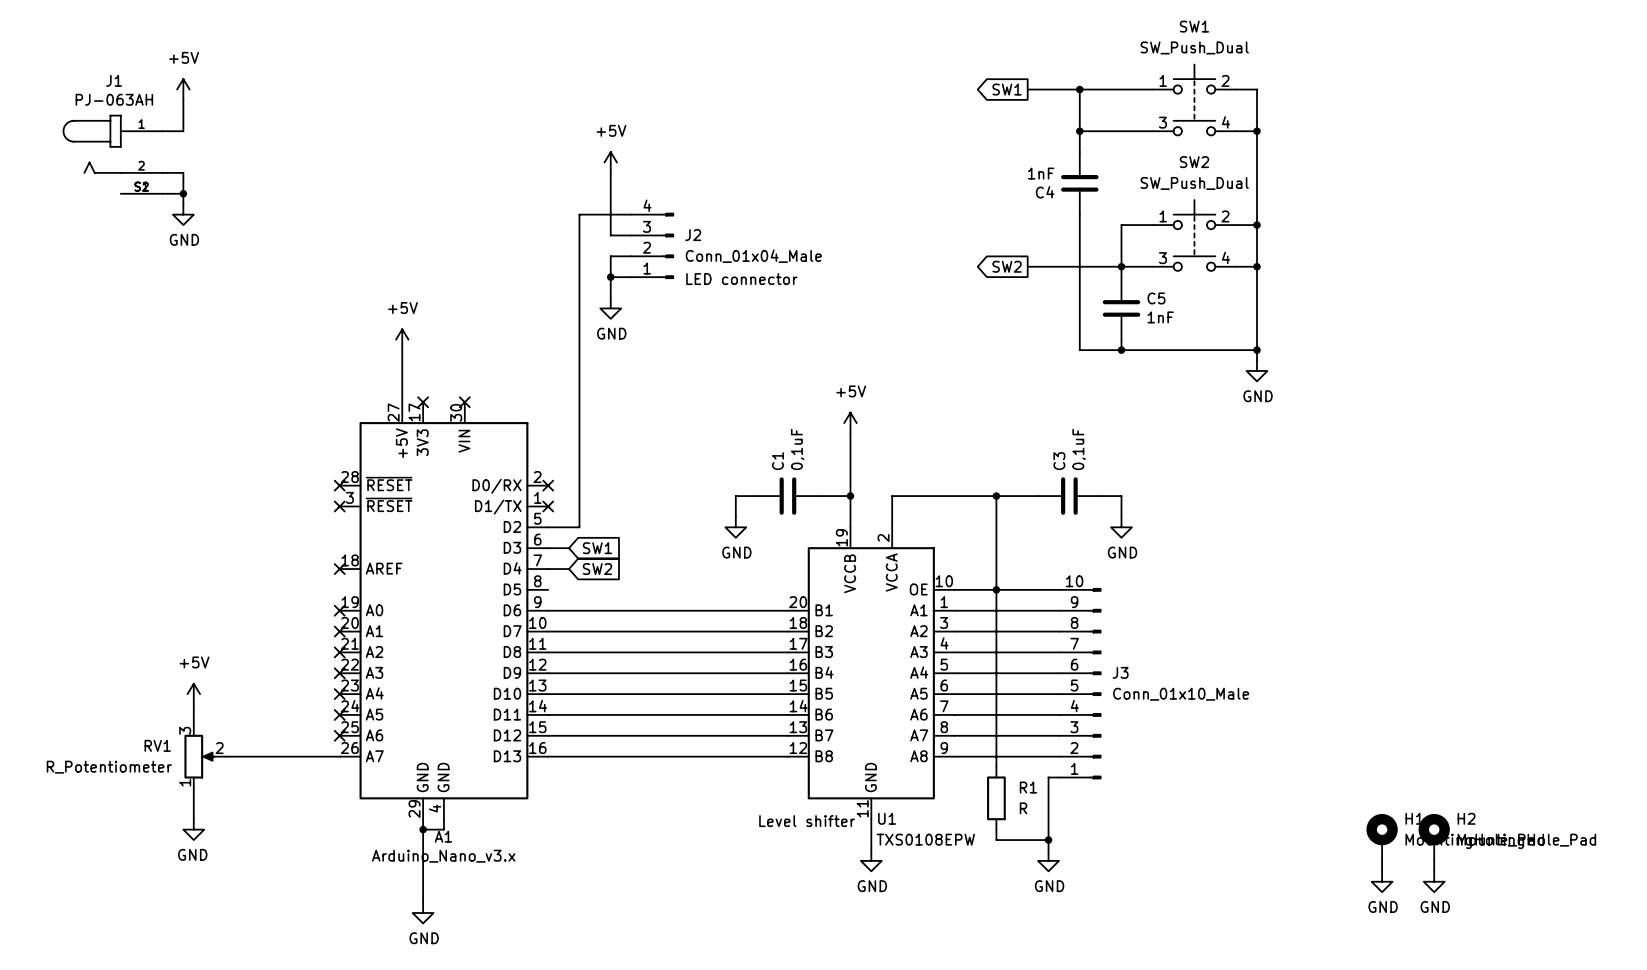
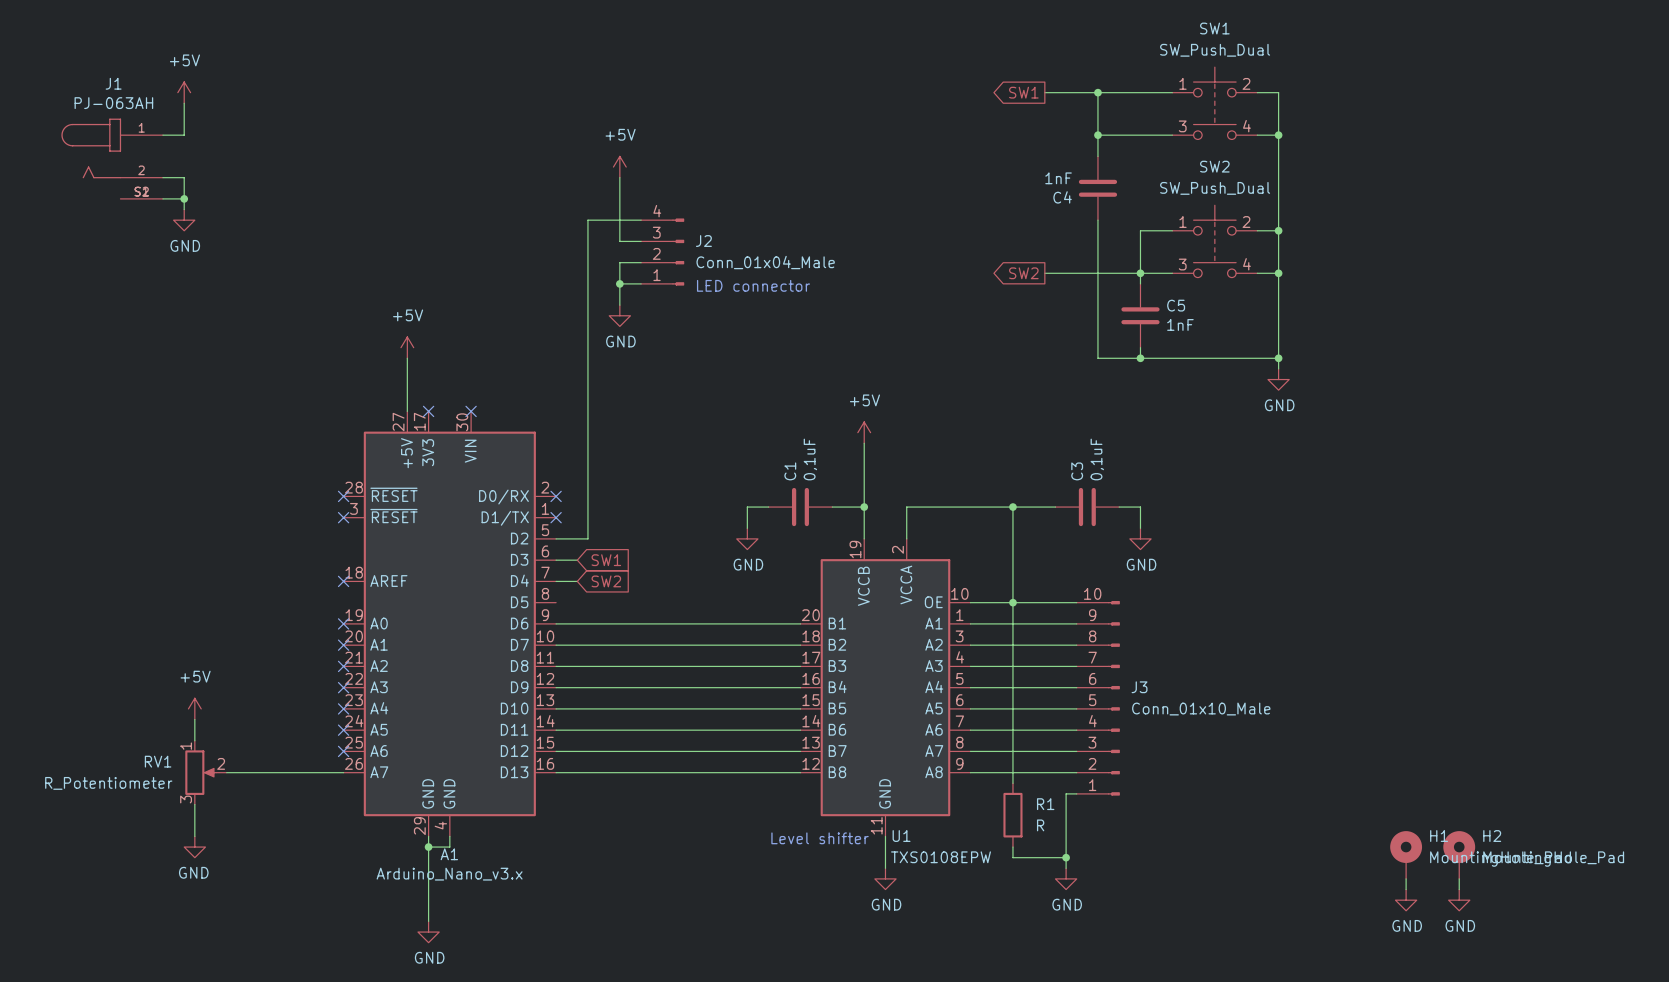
RV1 flip: as is (199, 756) -> up-down (200, 772)

